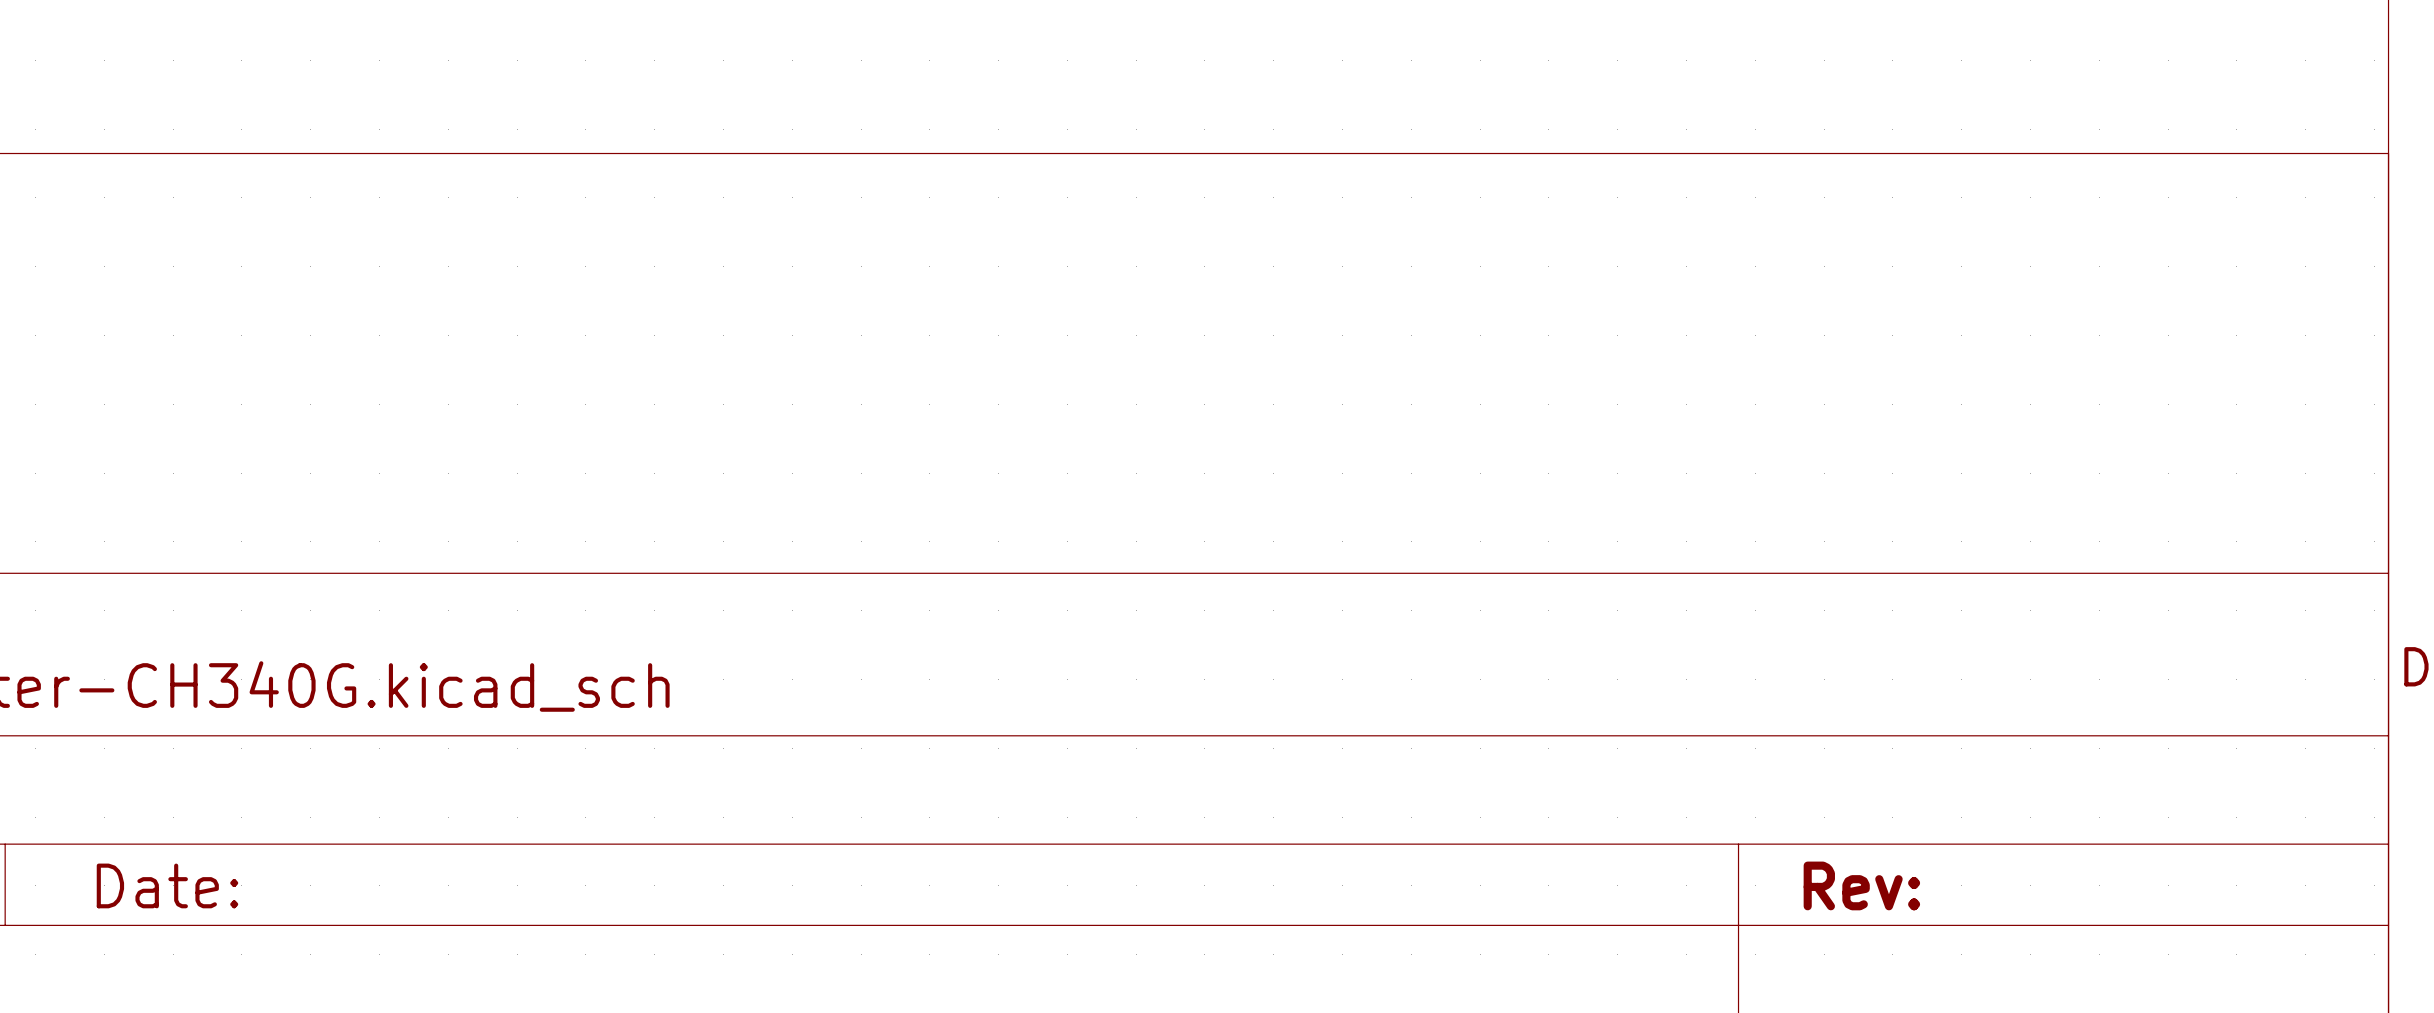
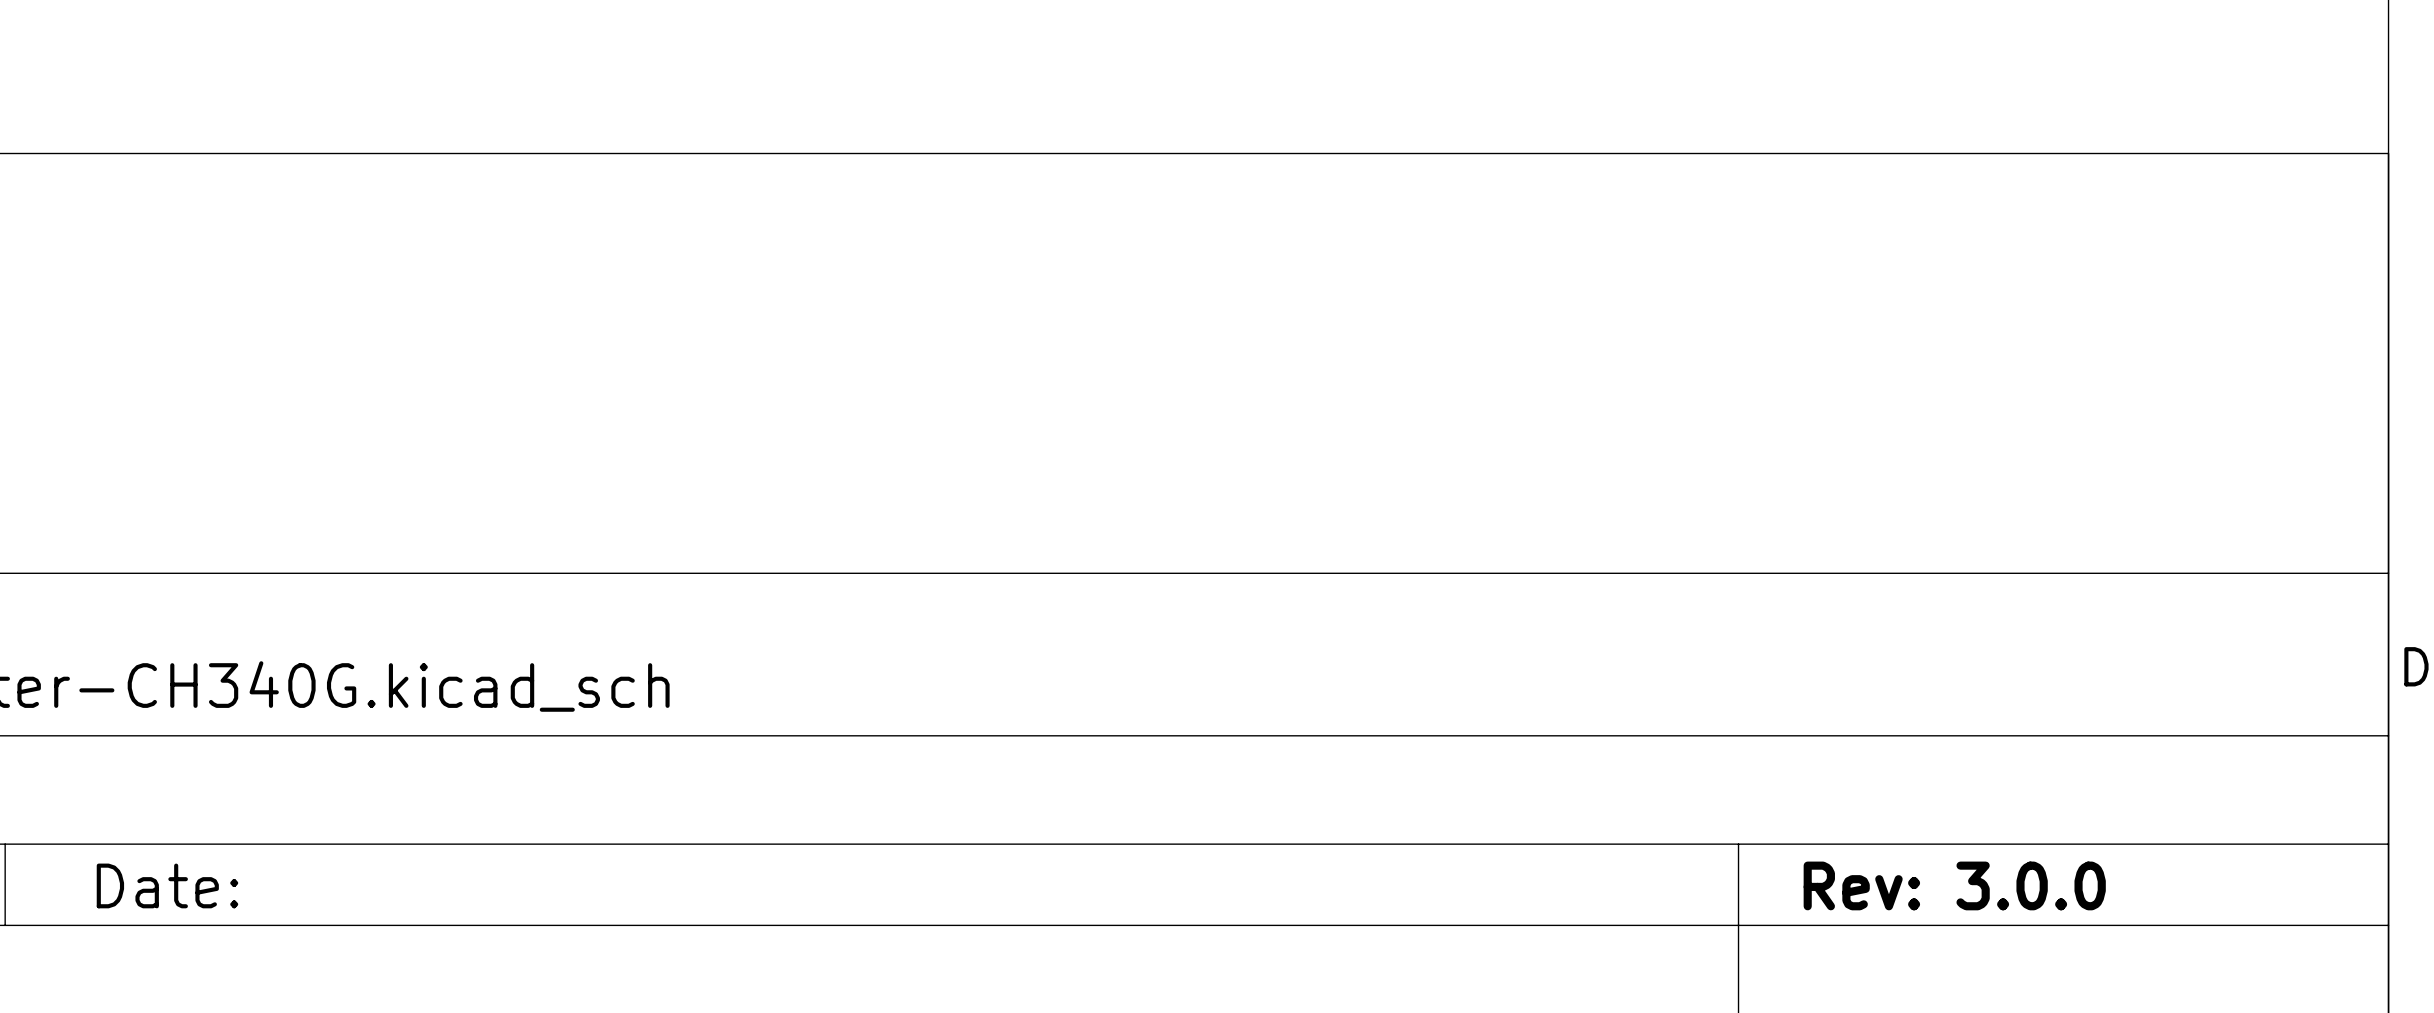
title block: Rev: (1861, 885) -> Rev: 3.0.0 (1954, 885)

